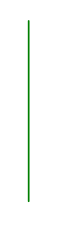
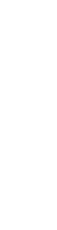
wire: (28, 20) (28, 201) -> none

